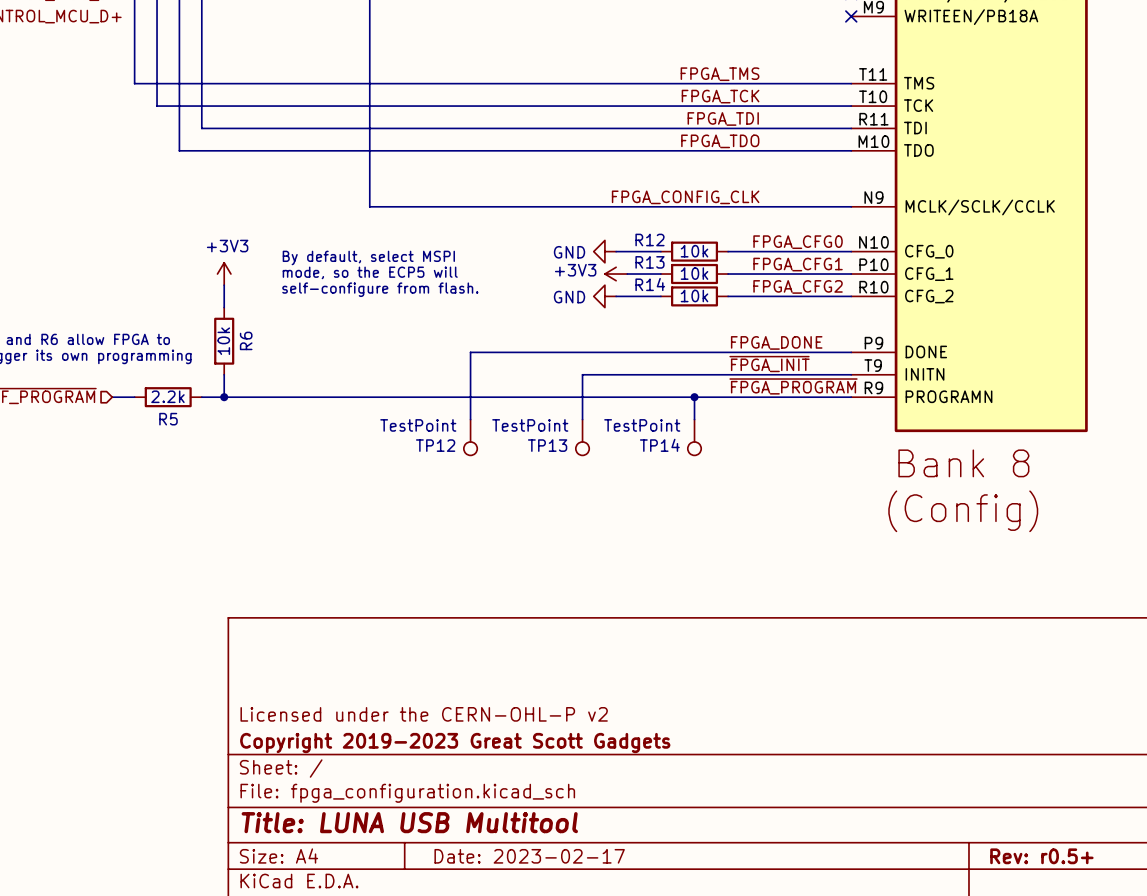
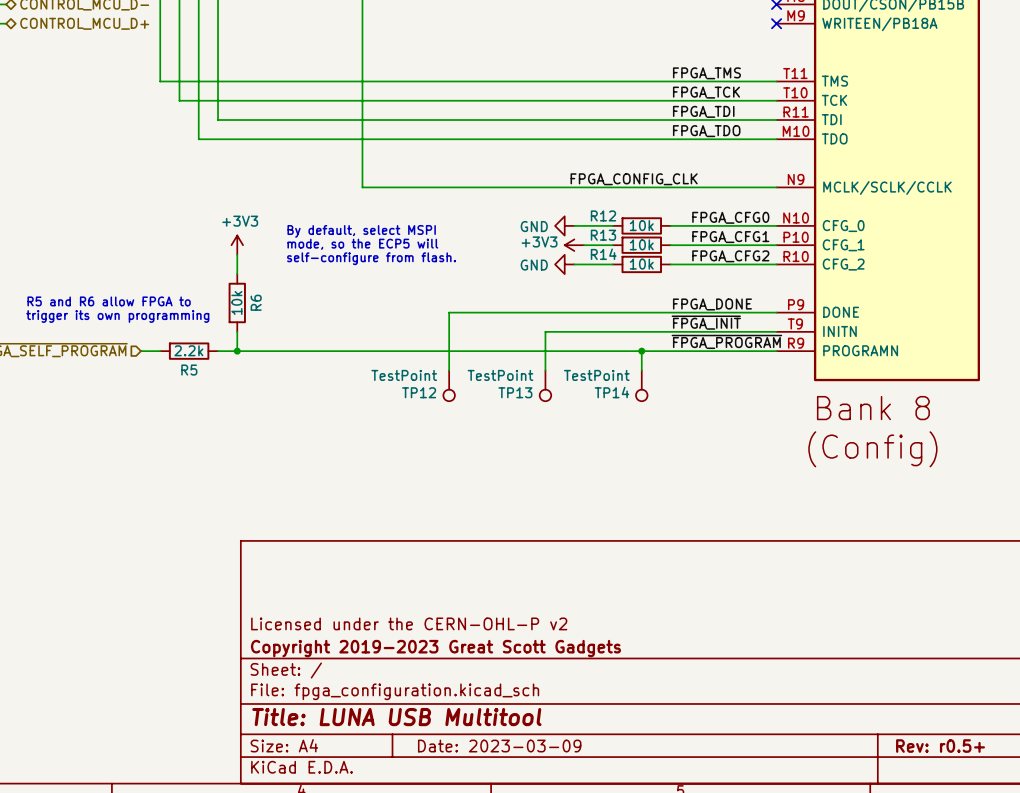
label position: FPGA_TMS (720, 74) -> FPGA_TMS (706, 73)
label position: FPGA_TCK (720, 96) -> FPGA_TCK (706, 92)
label position: FPGA_TDI (723, 118) -> FPGA_TDI (703, 111)
label position: FPGA_TDO (720, 141) -> FPGA_TDO (706, 131)
title block: Date: 2023-02-17 (529, 856) -> Date: 2023-03-09 (499, 746)

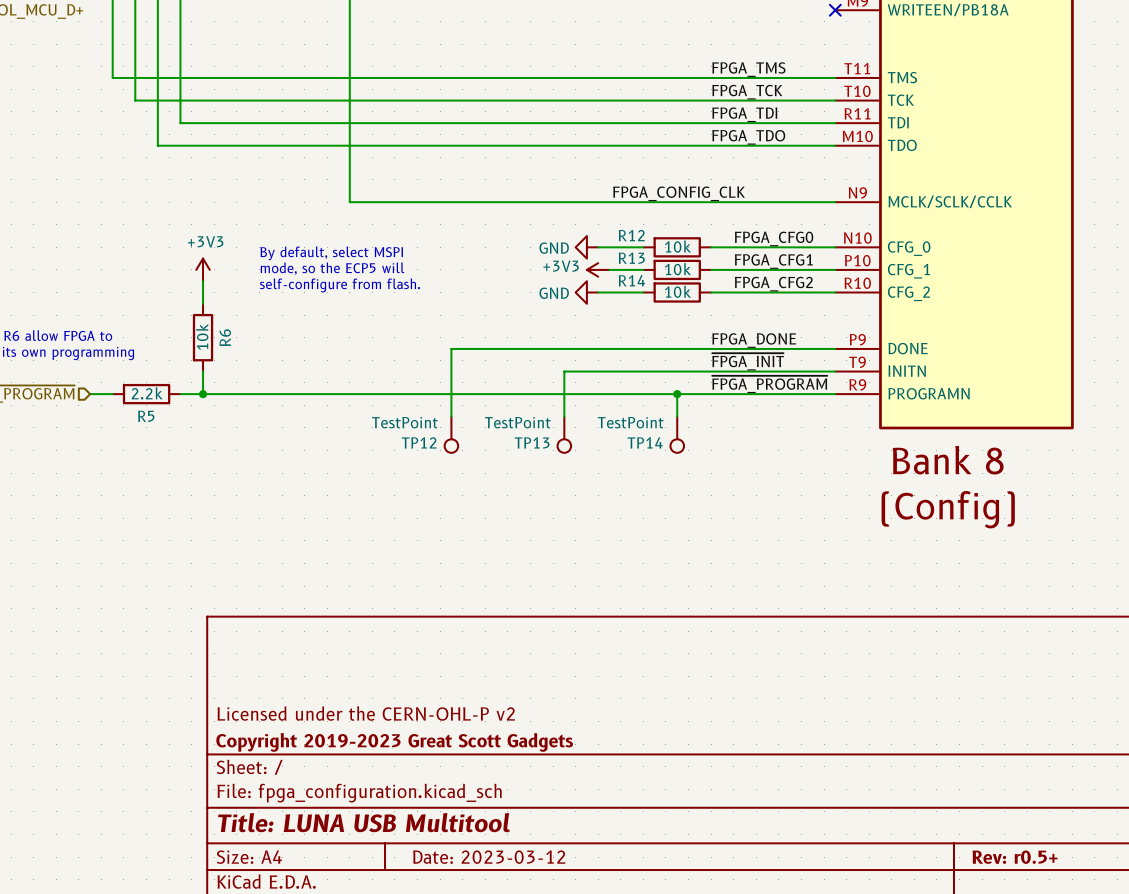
title block: Date: 2023-03-09 (499, 746) -> Date: 2023-03-12 (489, 857)

